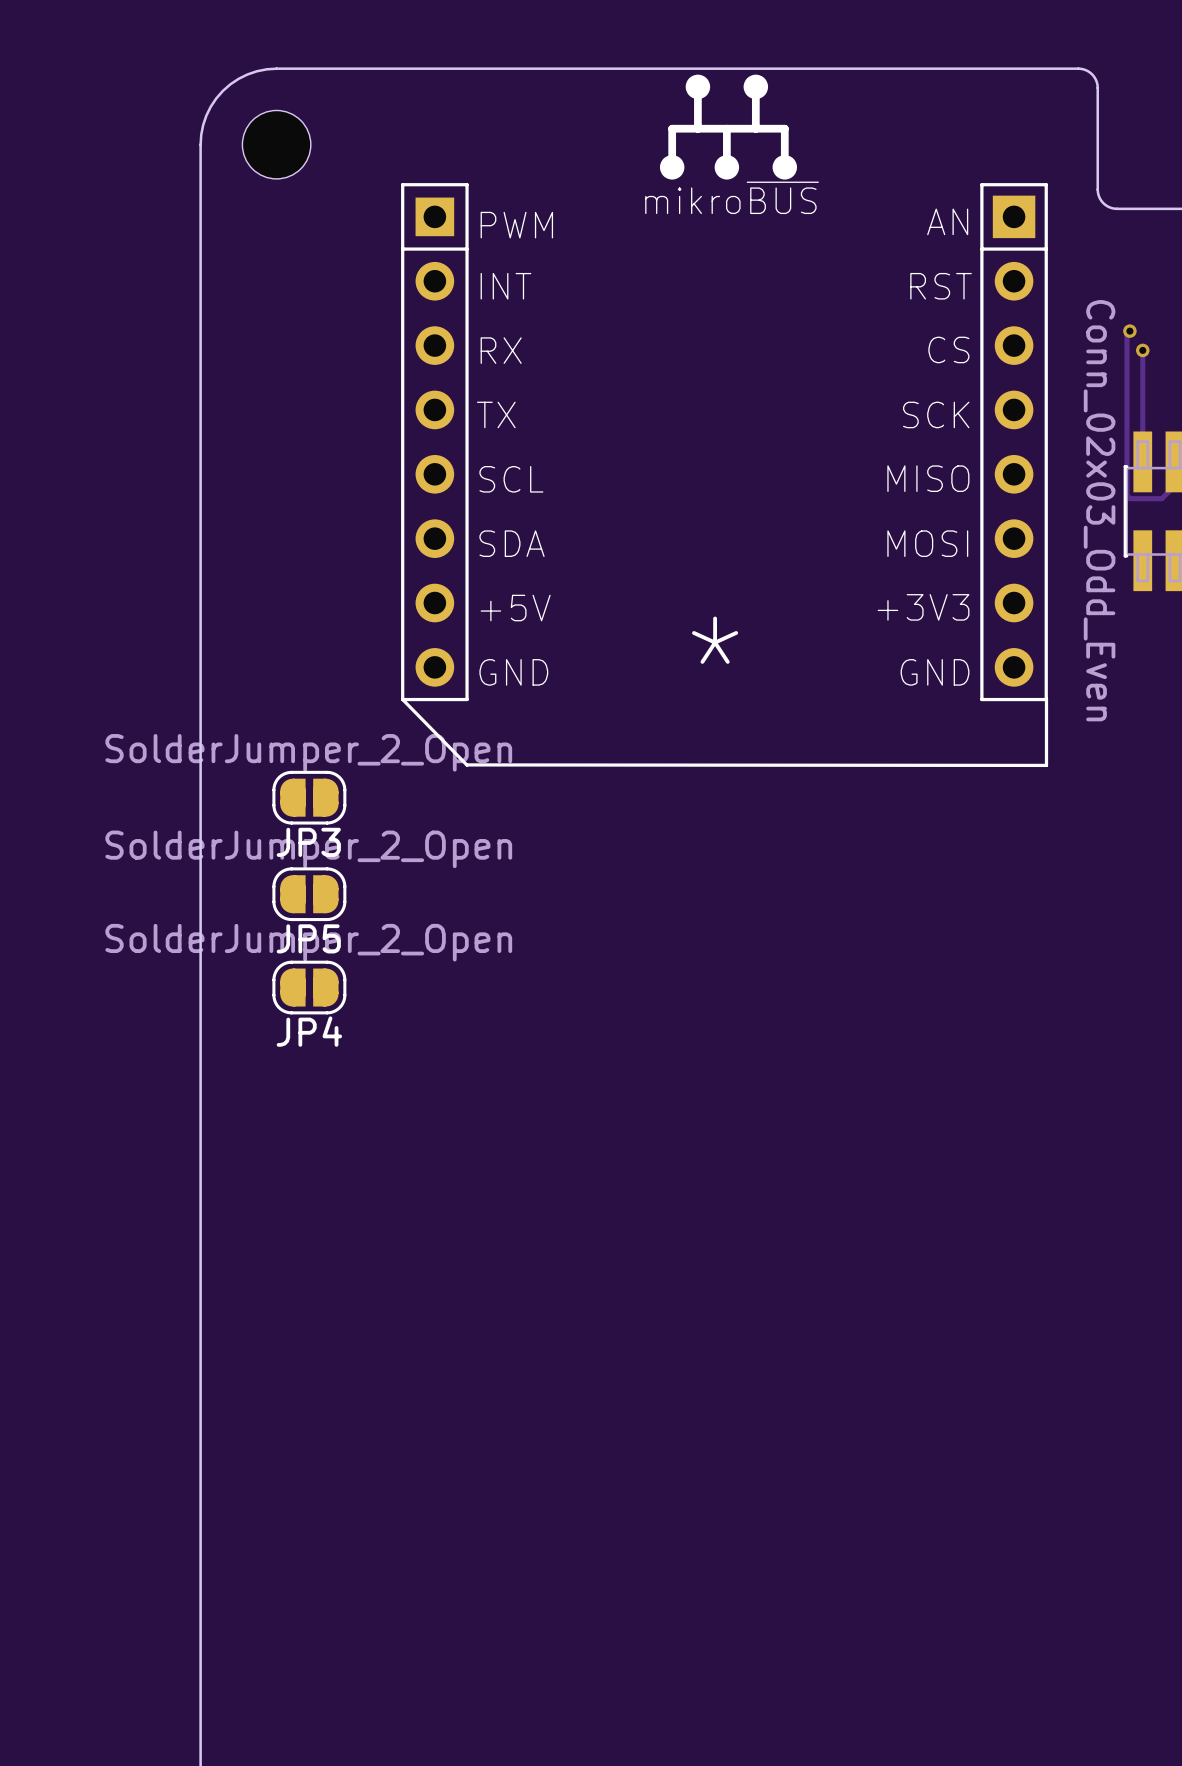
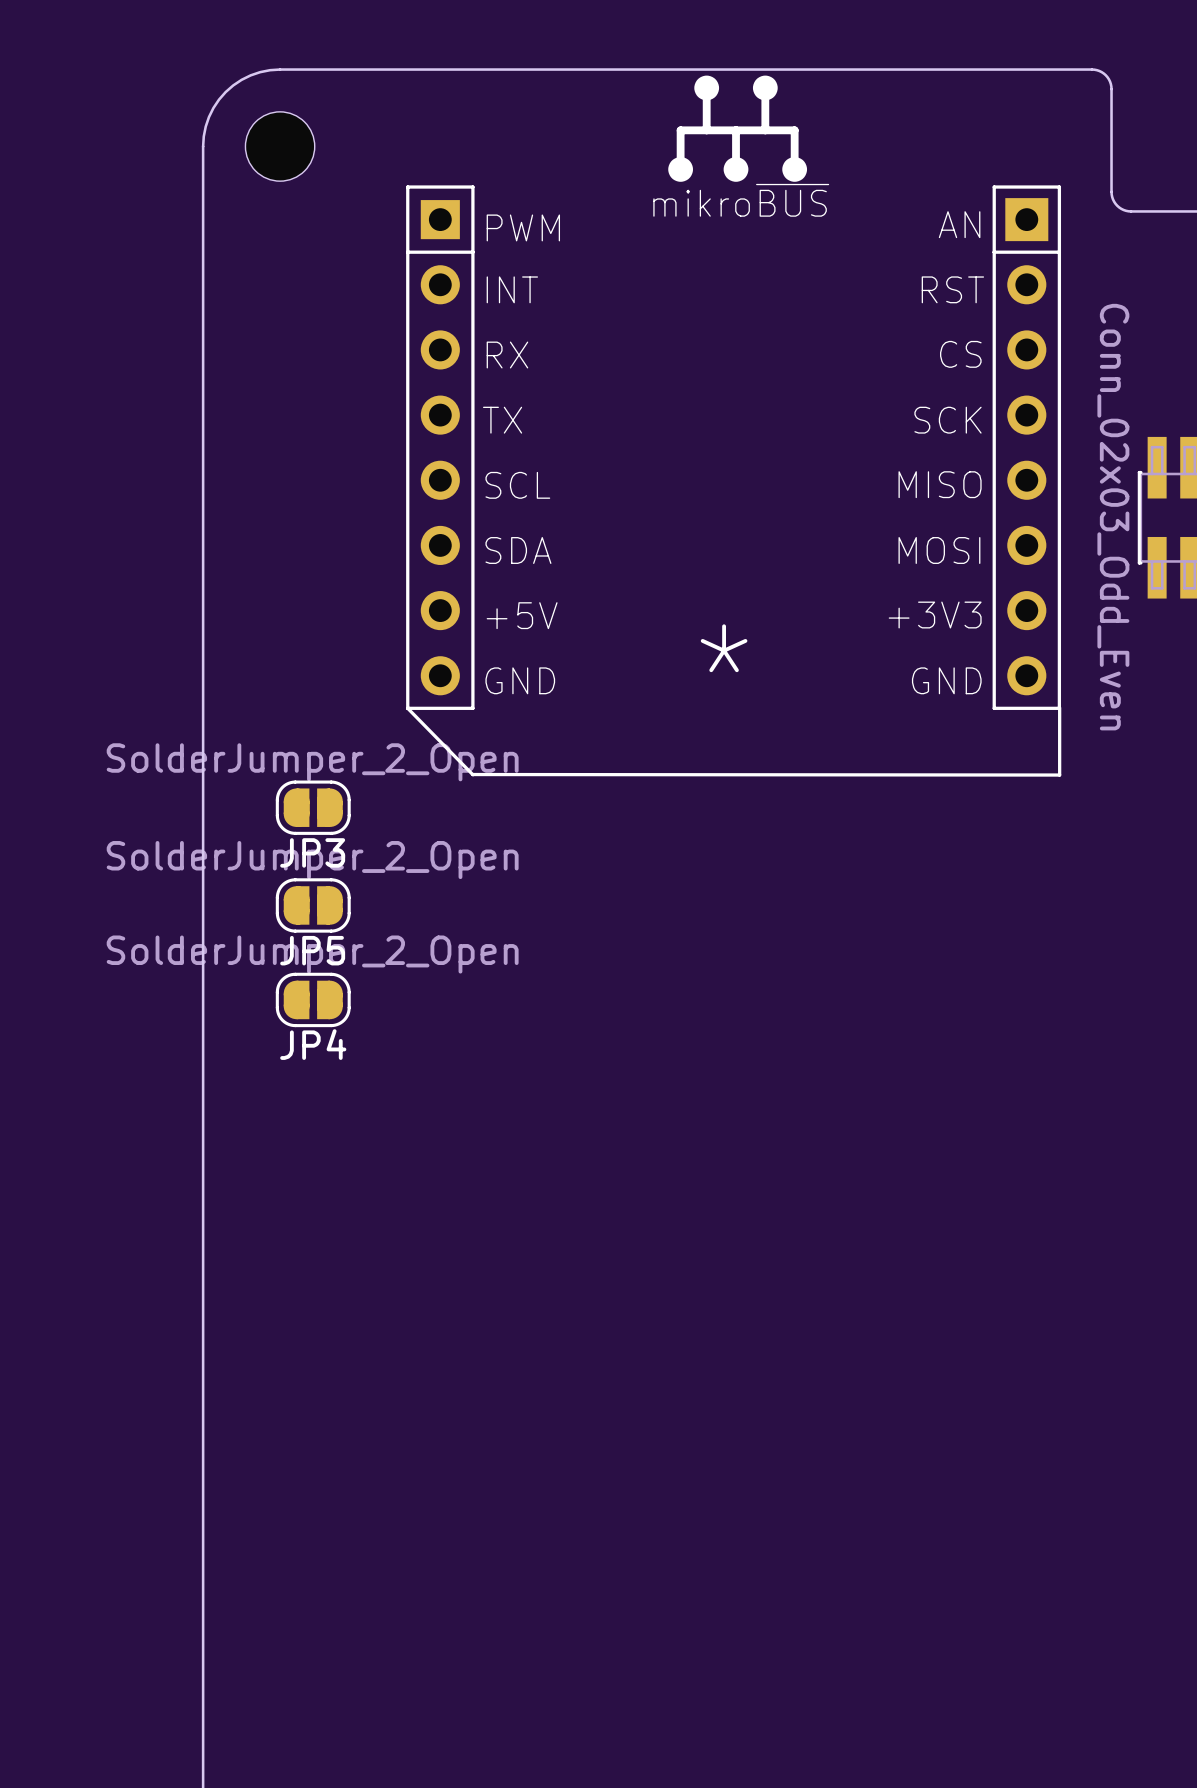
track: (1129, 331) (1127, 334) (1127, 495) (1130, 498) (1161, 498) (1174, 485) (1174, 461) -> none
via: (1129, 331) -> none
track: (1142, 350) (1142, 461) -> none
via: (1142, 350) -> none

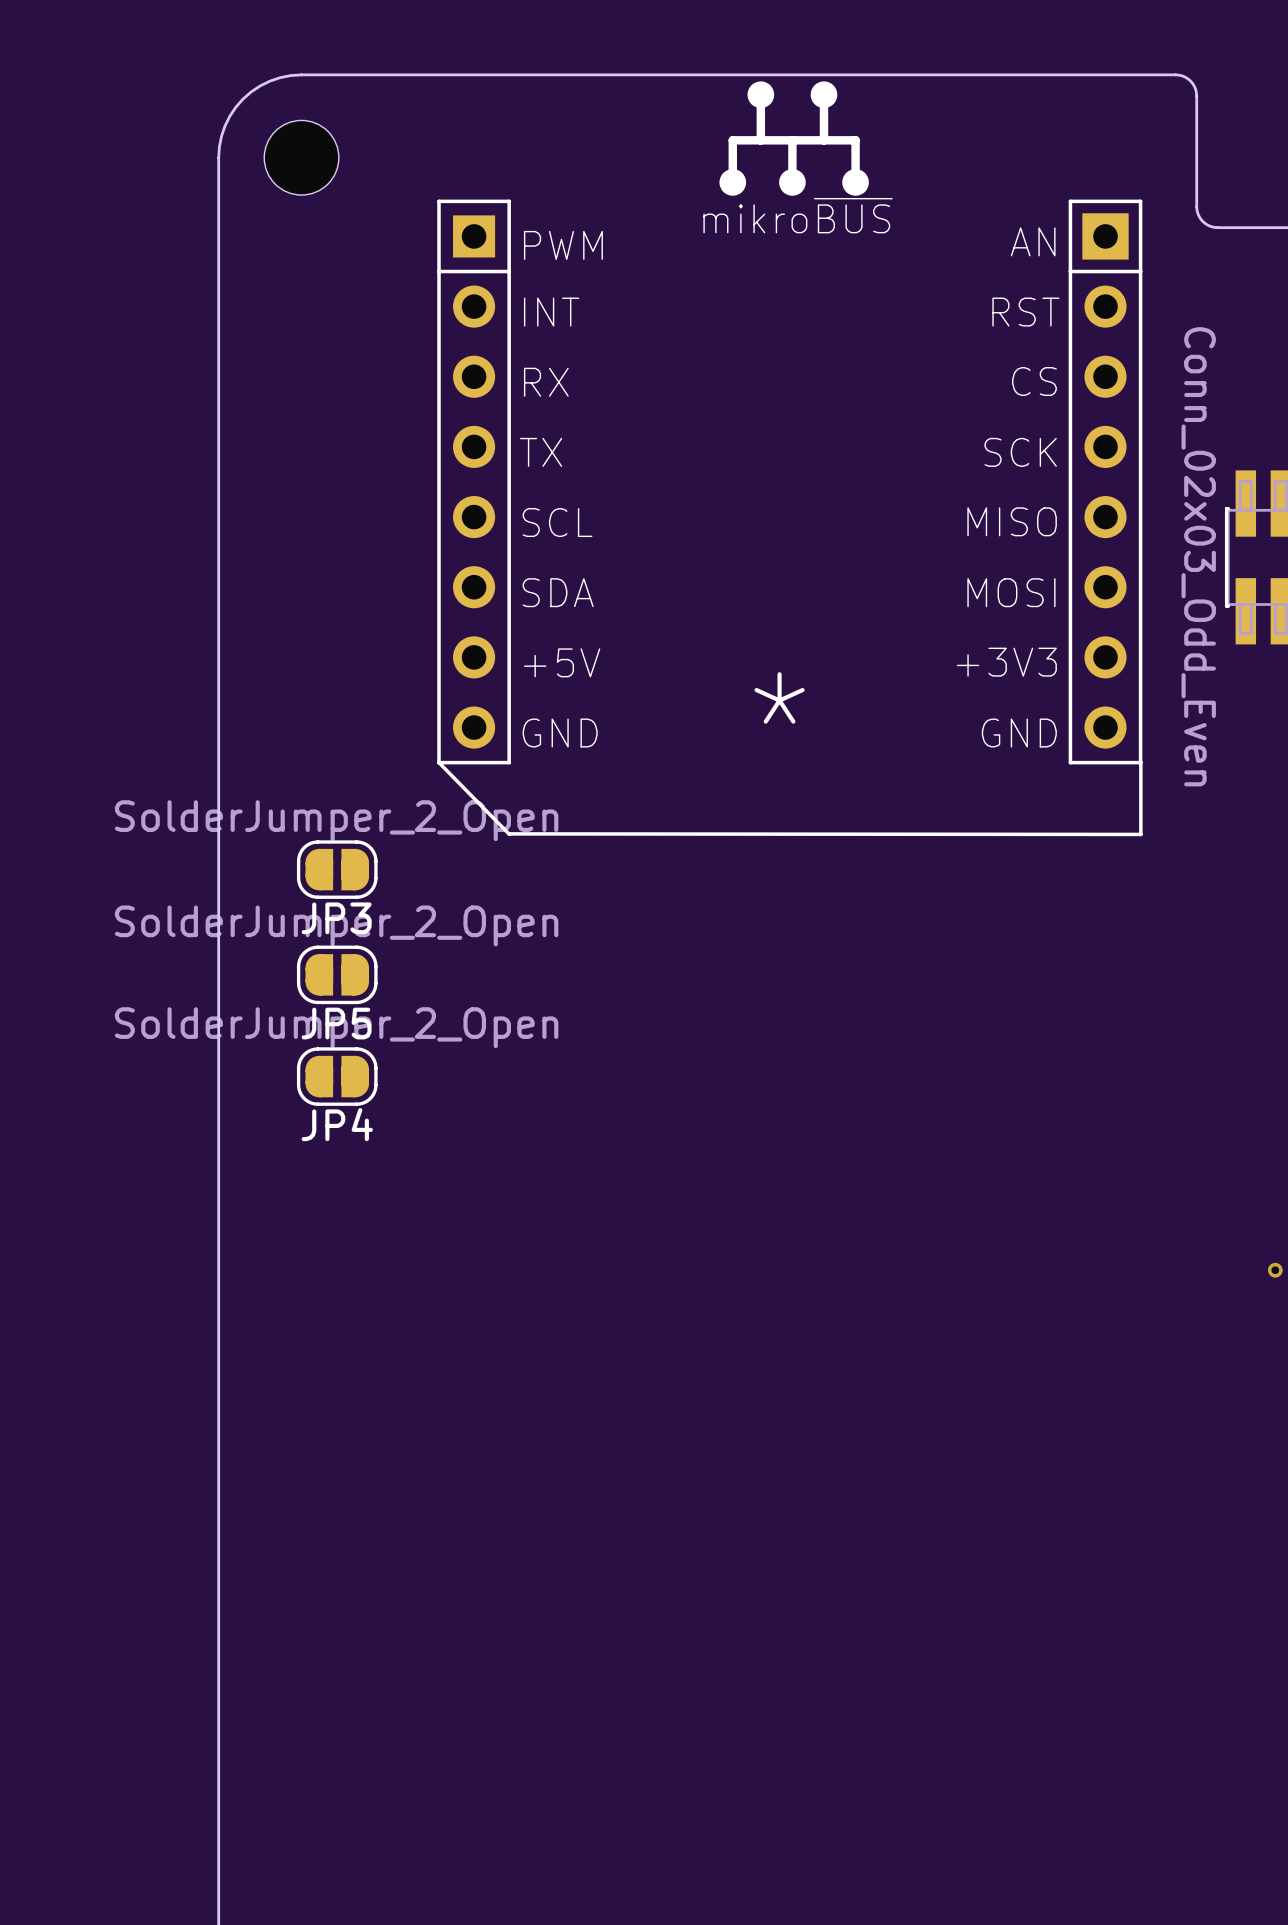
via: none -> (1275, 1270)

